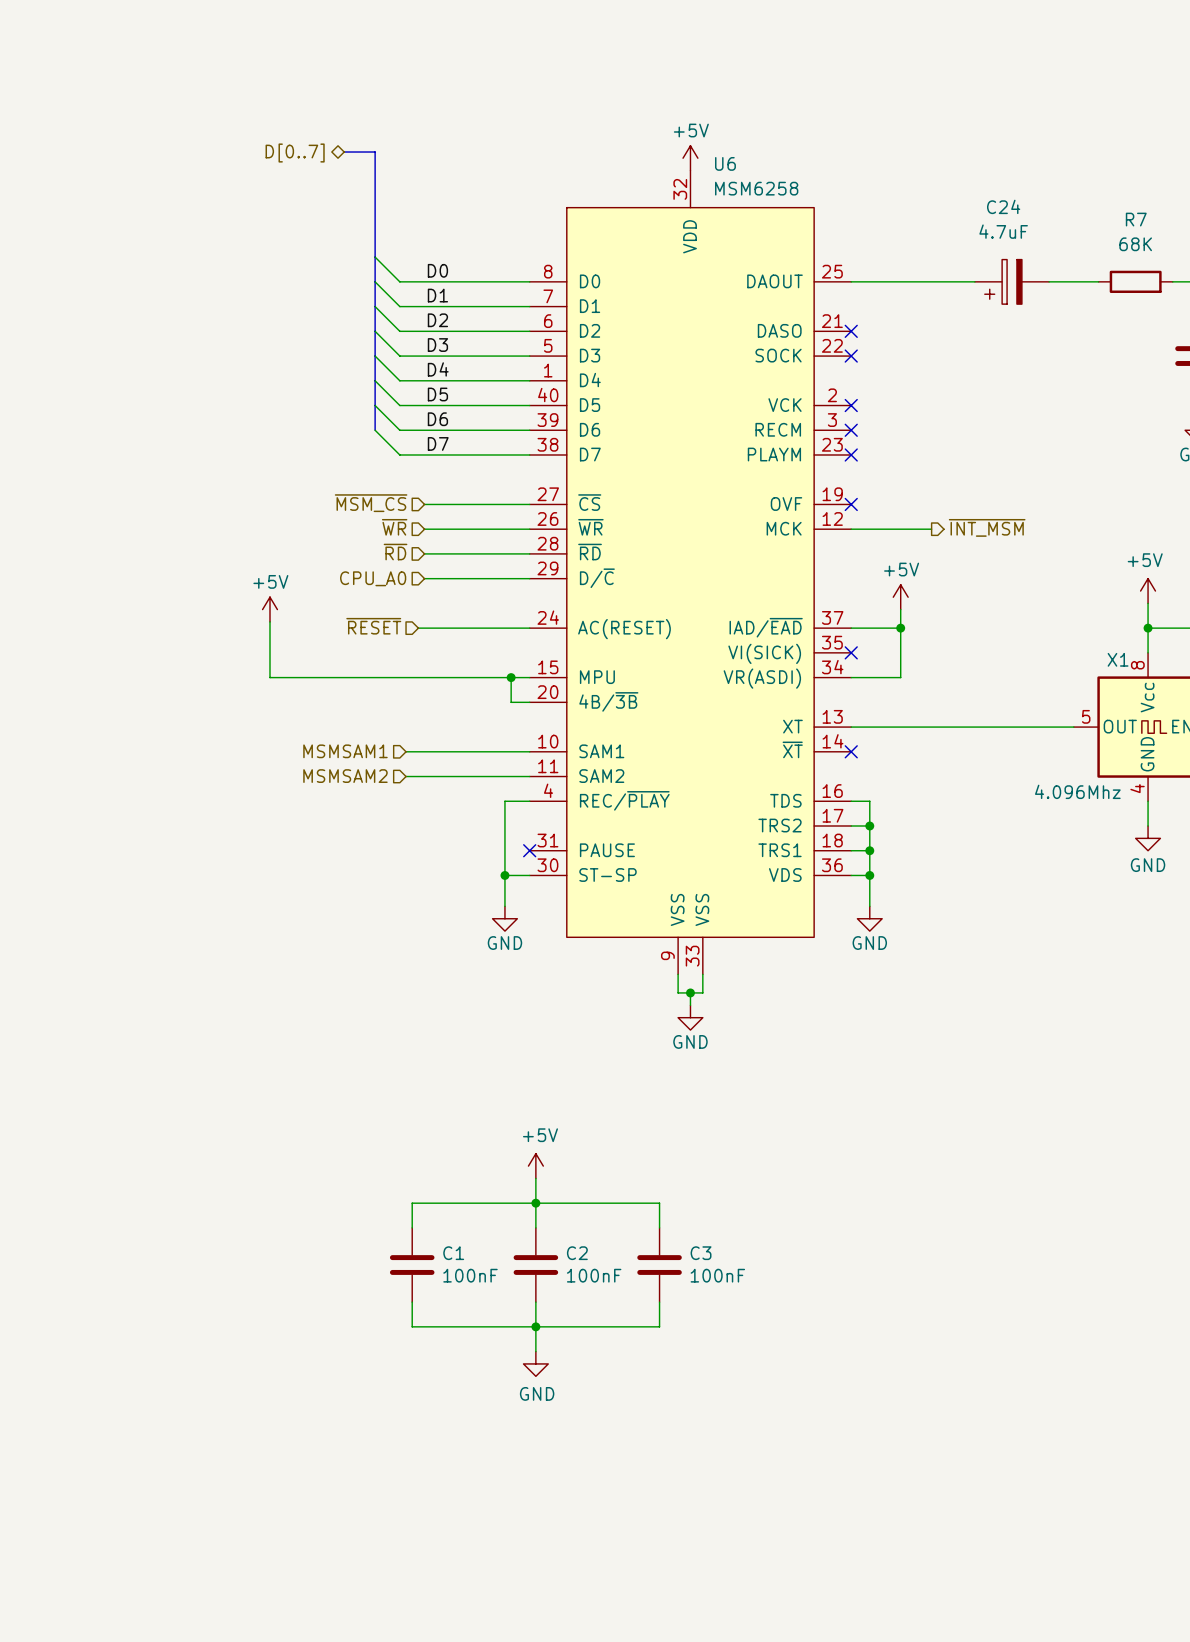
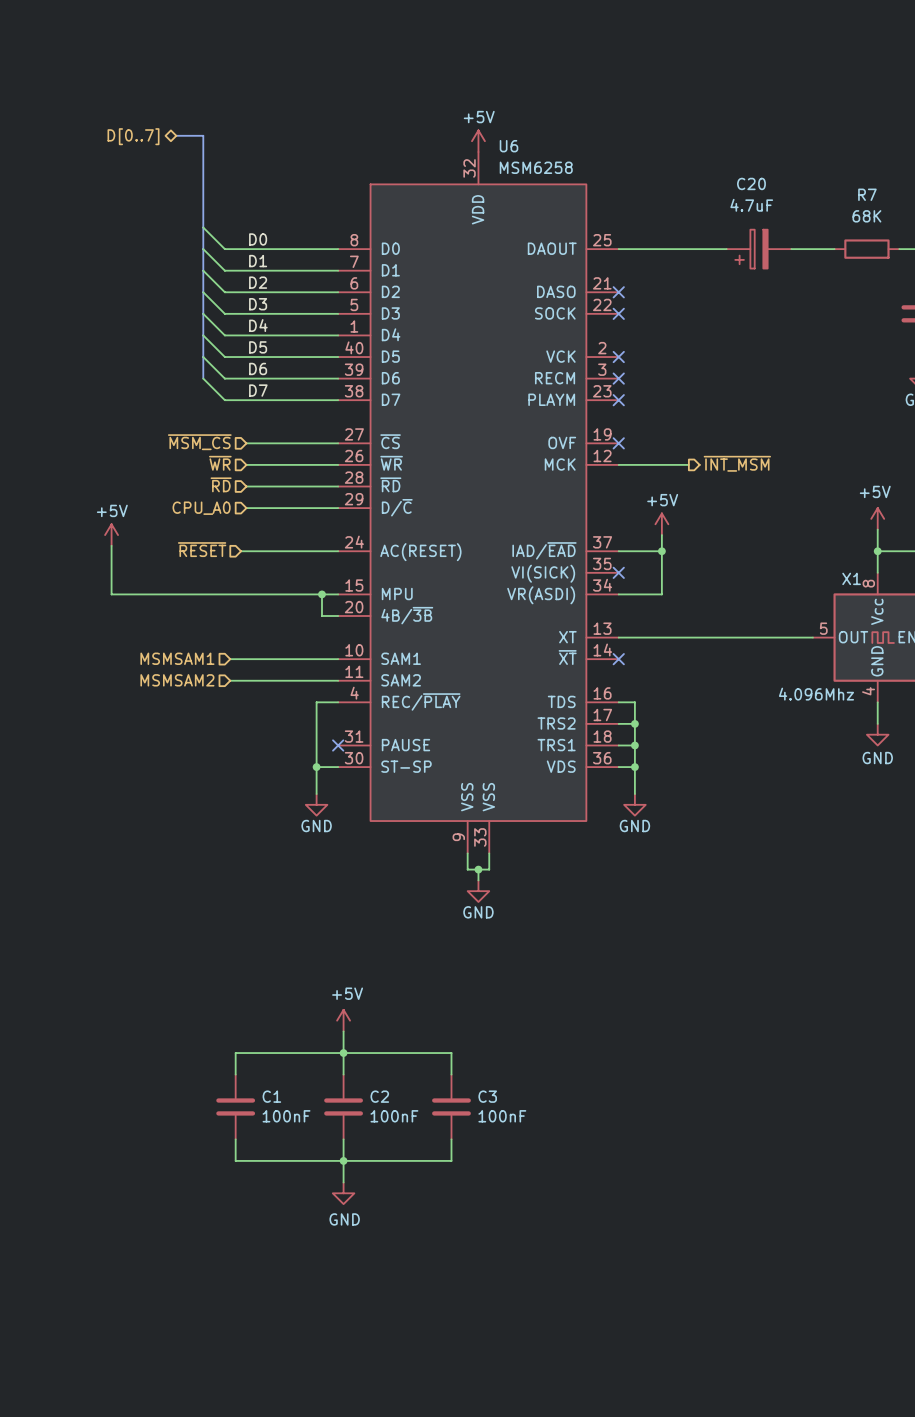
C24 name: C24 (1003, 206) -> C20 (751, 183)

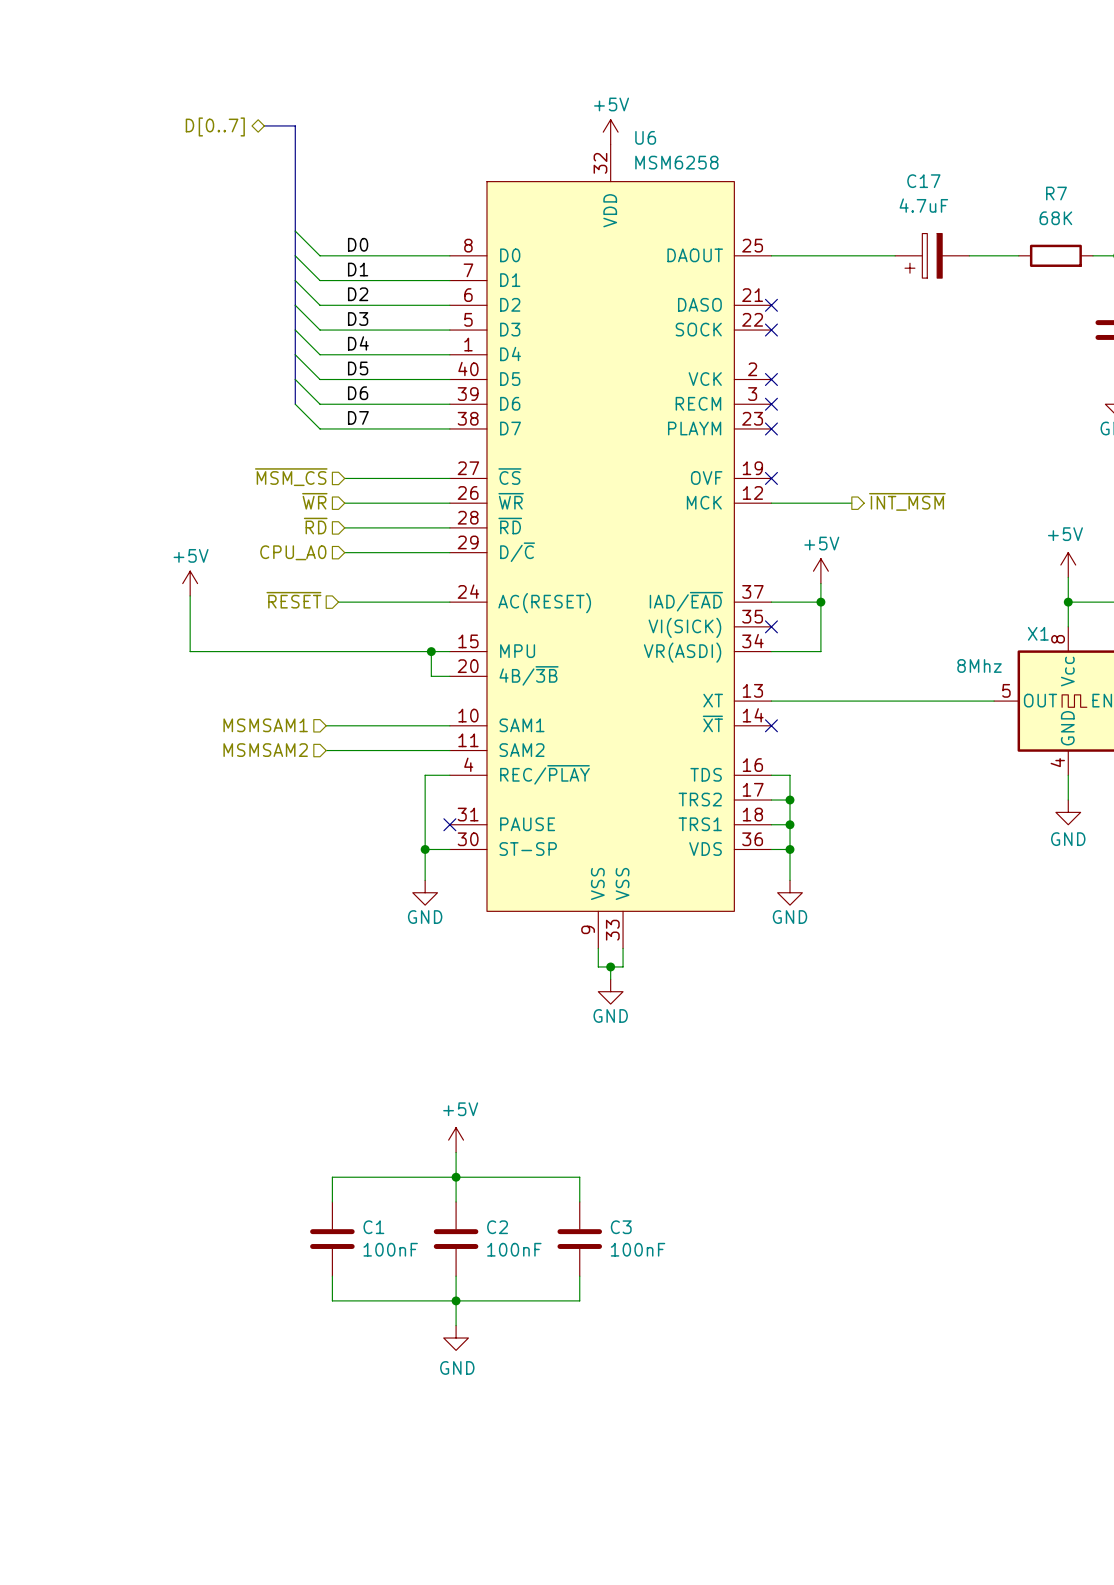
C20 name: C20 (751, 183) -> C17 (923, 181)
X1 value: 4.096Mhz (816, 694) -> 8Mhz (979, 665)

